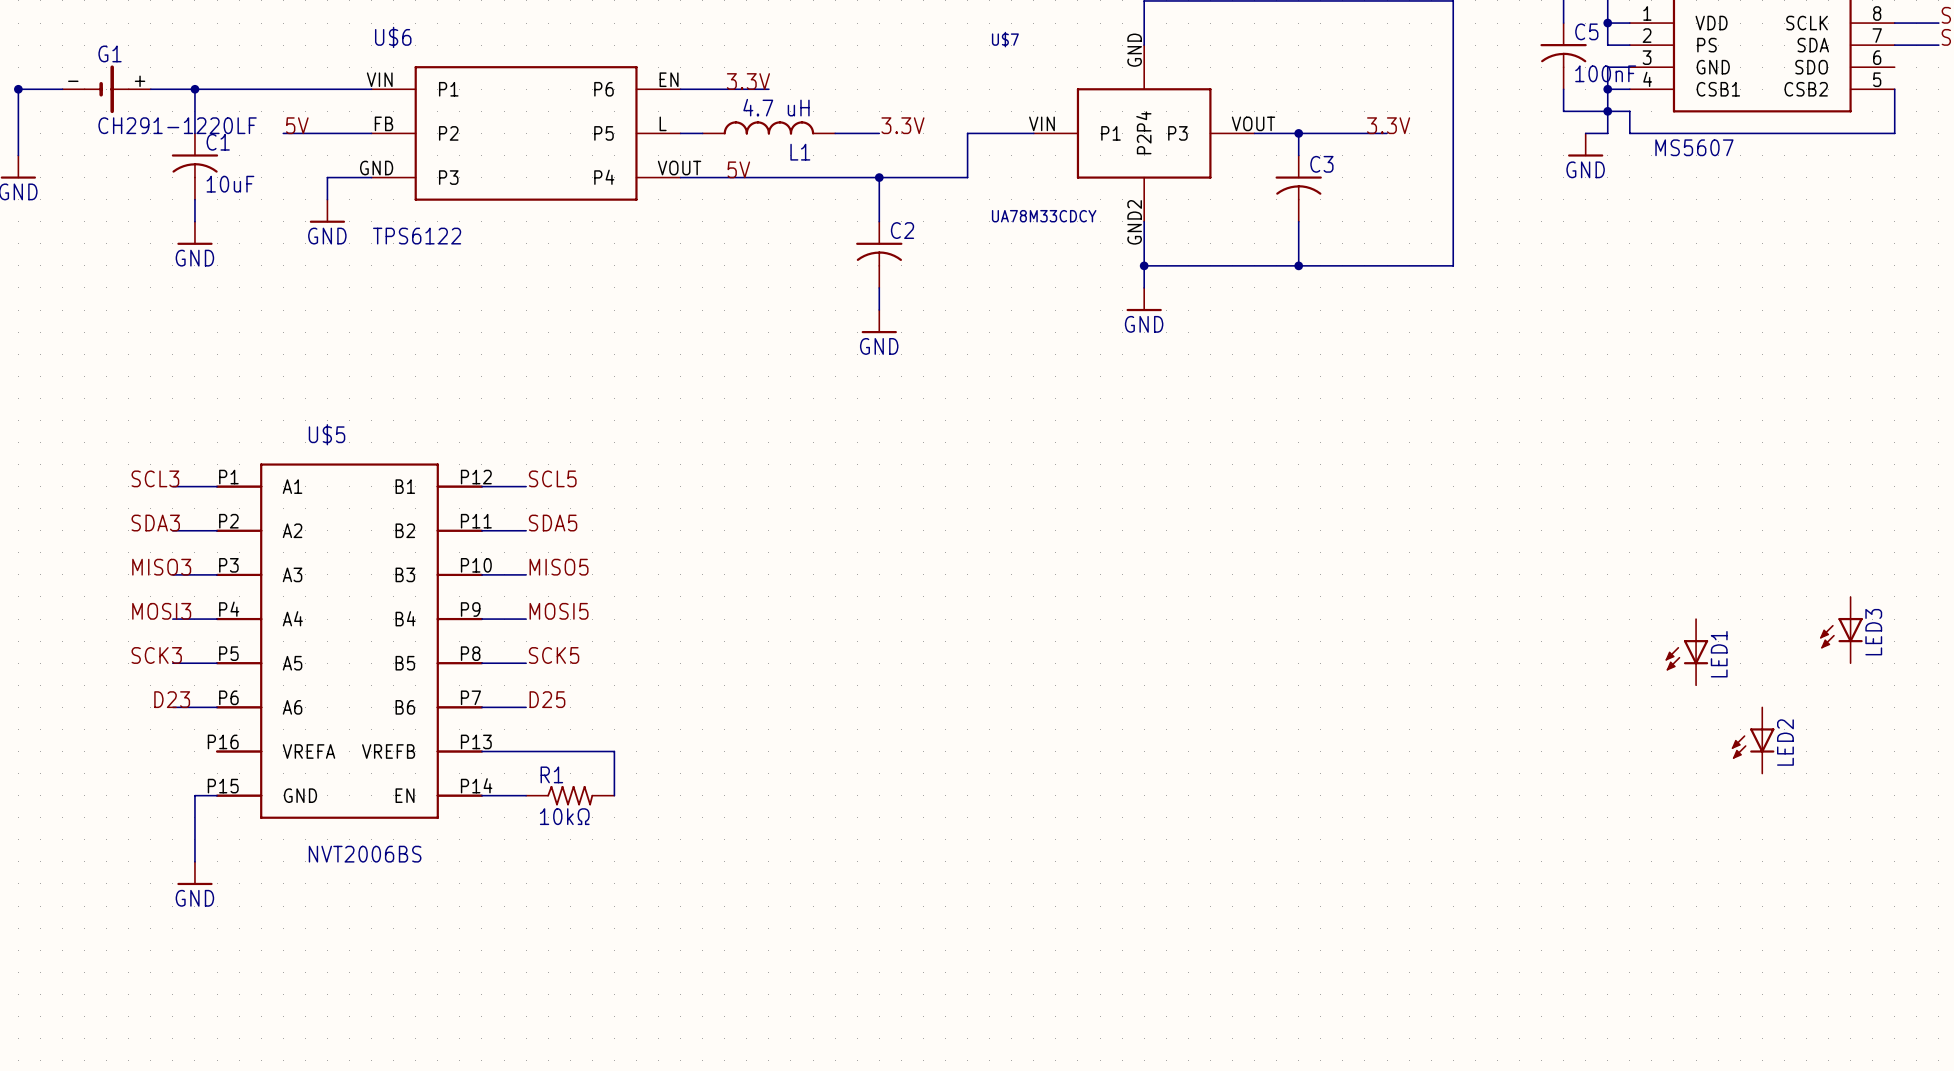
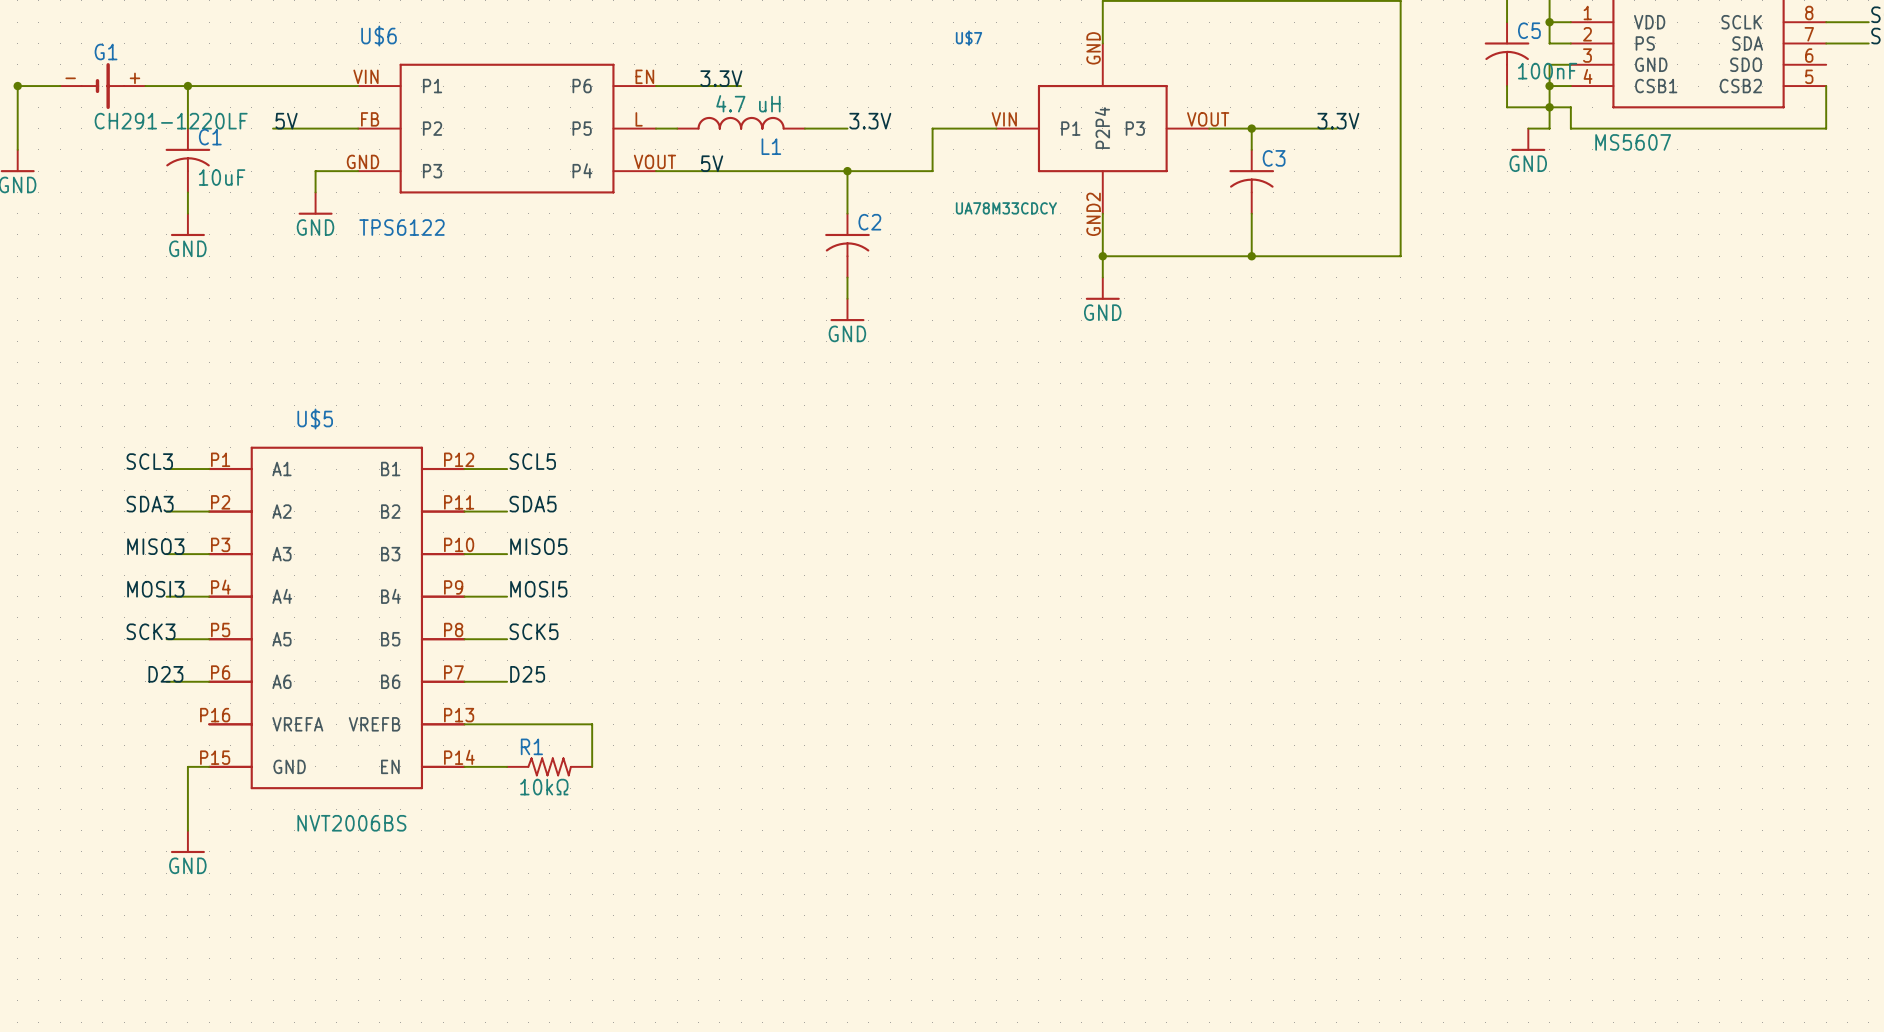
LED3: (1841, 630) -> none
LED1: (1686, 652) -> none
LED2: (1753, 740) -> none

